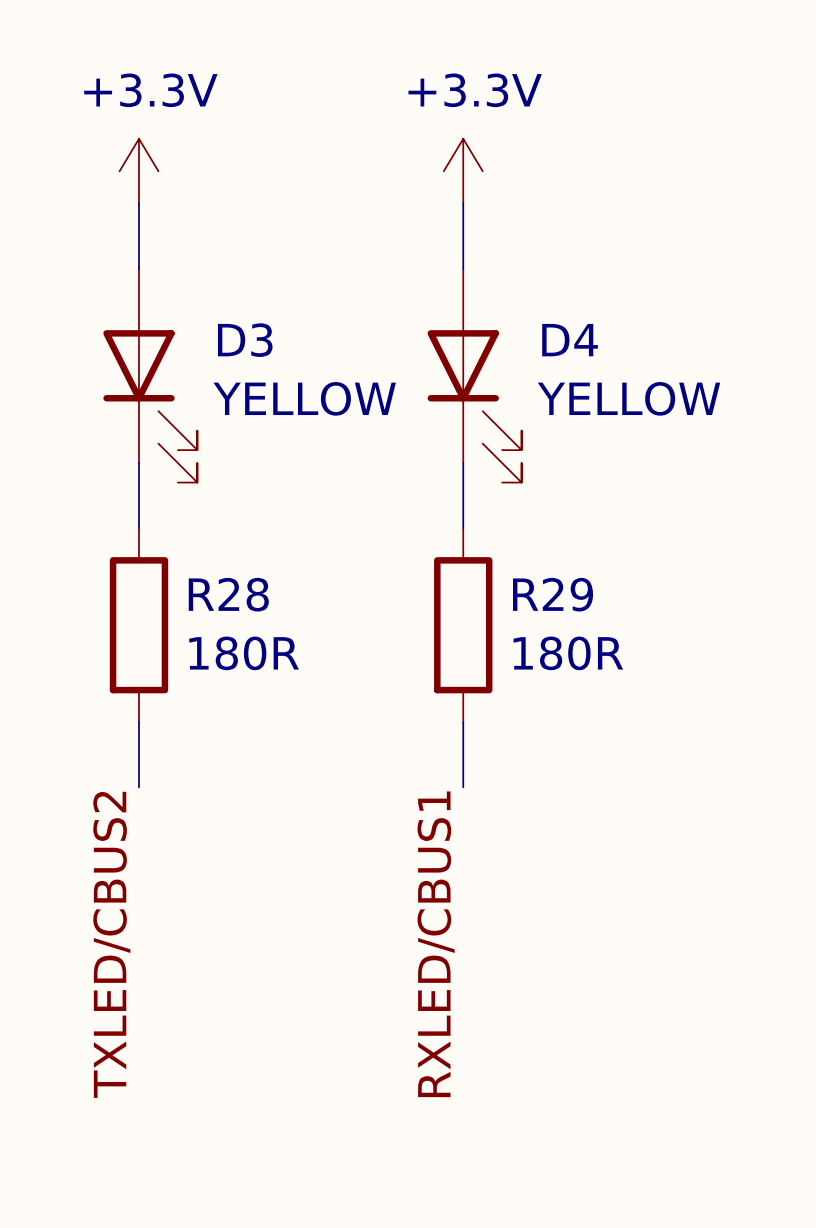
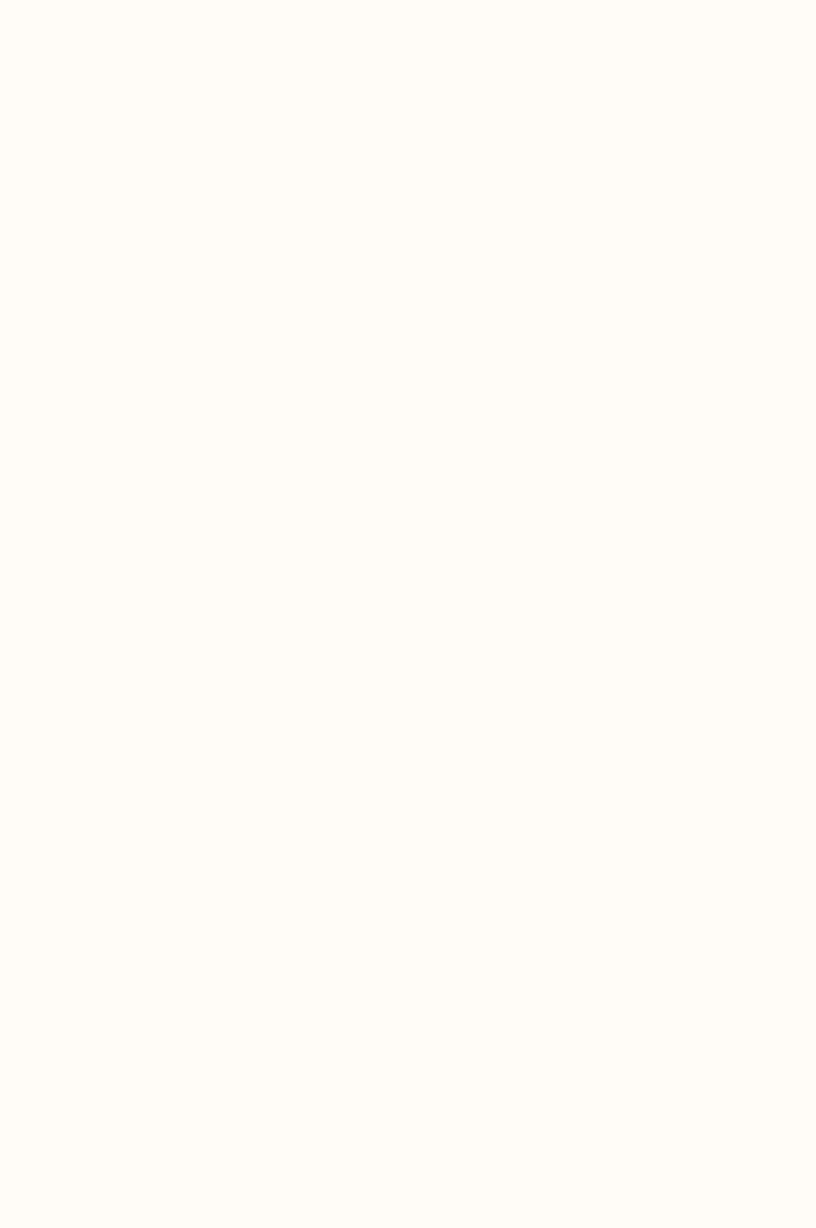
power symbol: +3.3V (138, 171) -> none
power symbol: +3.3V (463, 171) -> none
wire: (138, 203) (138, 268) -> none
wire: (463, 203) (463, 268) -> none
D3: YELLOW (150, 375) -> none
D4: YELLOW (474, 375) -> none
wire: (138, 463) (138, 527) -> none
wire: (463, 463) (463, 527) -> none
R28: 180R (138, 625) -> none
R29: 180R (463, 625) -> none
wire: (138, 722) (138, 787) -> none
wire: (463, 722) (463, 787) -> none
label: TXLED/CBUS2 (111, 944) -> none
label: RXLED/CBUS1 (436, 944) -> none

